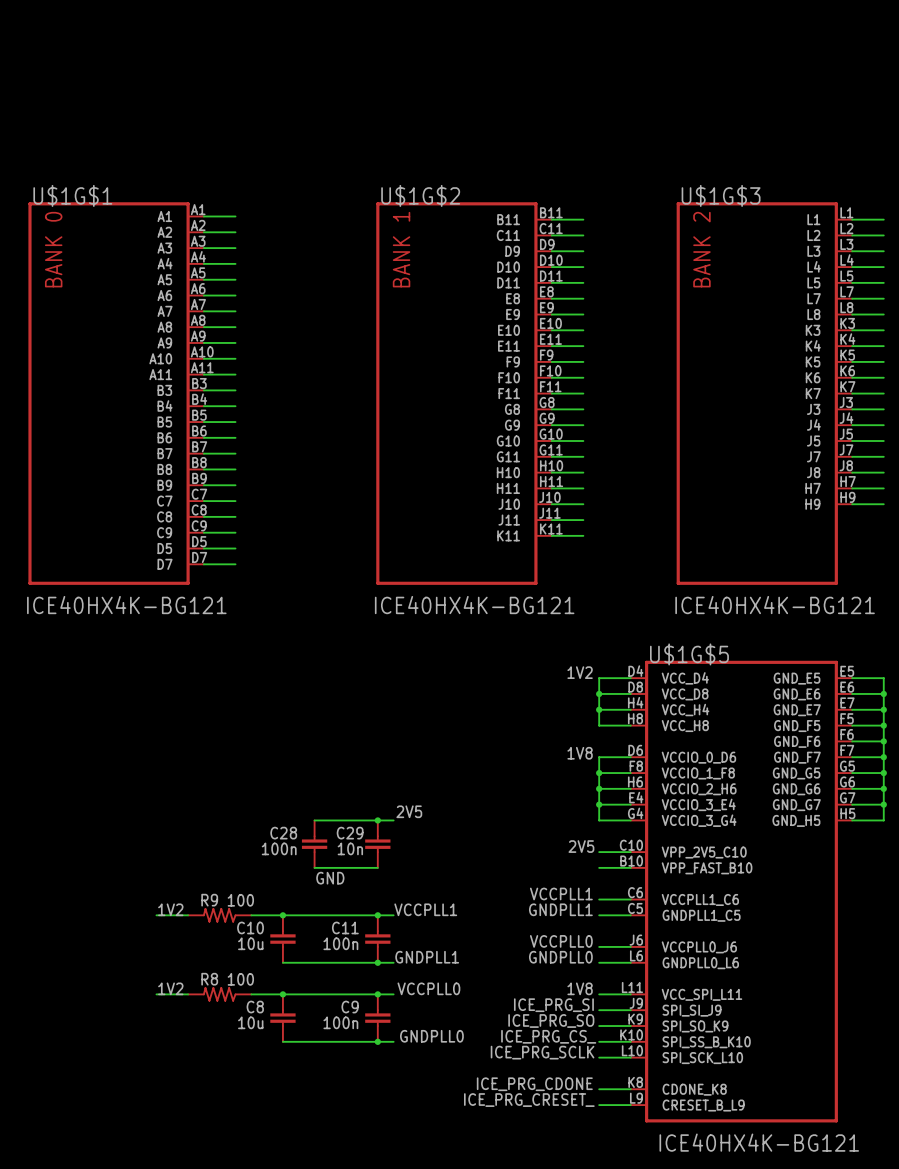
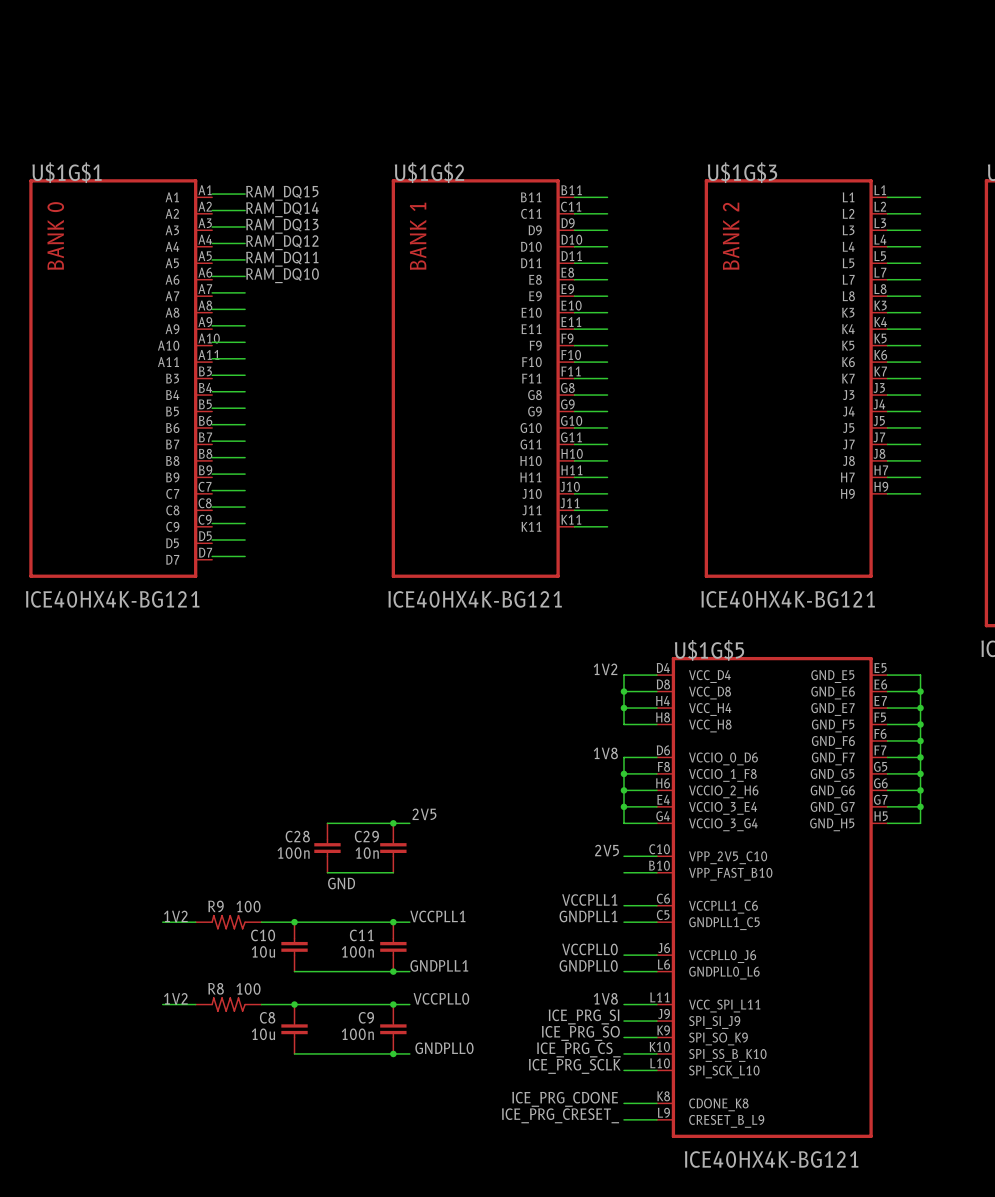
U$1G$1 symbol: [28, 202, 204, 585] -> [29, 179, 213, 578]
label: none -> RAM_DQ15 (282, 193)
label: none -> RAM_DQ14 (282, 209)
label: none -> RAM_DQ13 (282, 226)
label: none -> RAM_DQ12 (282, 242)
label: none -> RAM_DQ11 (282, 259)
label: none -> RAM_DQ10 (282, 275)

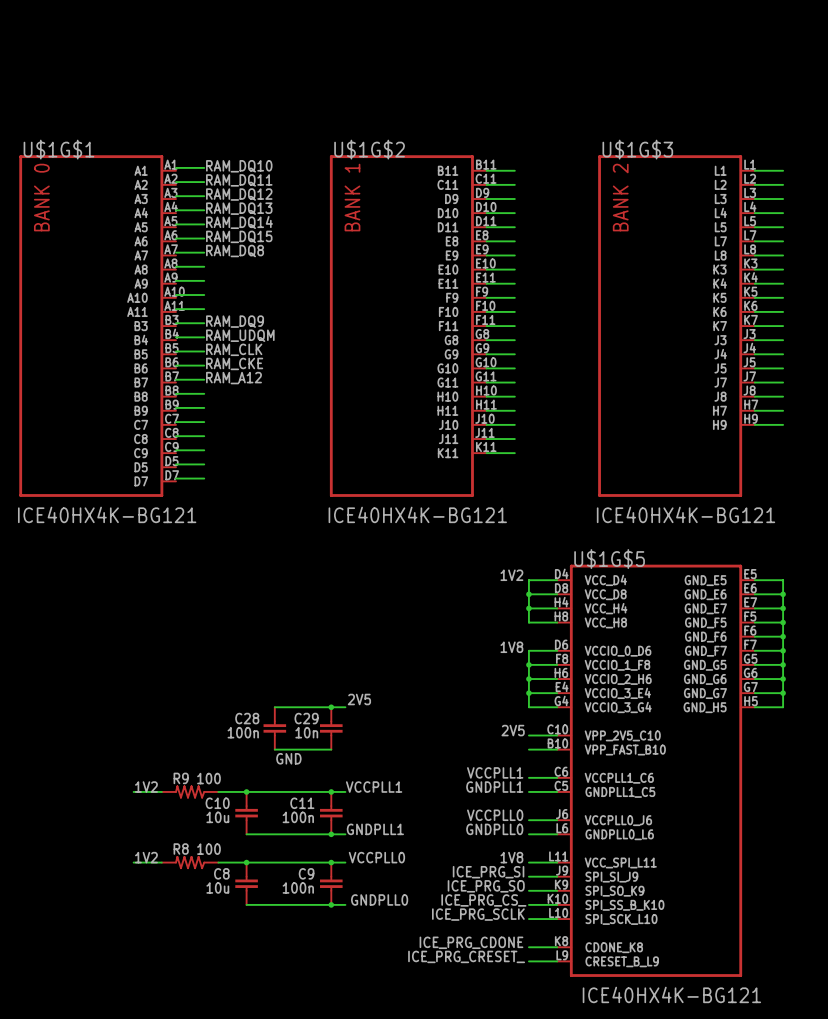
label: RAM_DQ15 (282, 193) -> RAM_DQ10 (239, 166)
label: RAM_DQ14 (282, 209) -> RAM_DQ11 (239, 180)
label: RAM_DQ13 (282, 226) -> RAM_DQ12 (239, 194)
label: RAM_DQ12 (282, 242) -> RAM_DQ13 (239, 208)
label: RAM_DQ11 (282, 259) -> RAM_DQ14 (239, 222)
label: RAM_DQ10 (282, 275) -> RAM_DQ15 (239, 236)
label: none -> RAM_DQ8 (235, 251)
label: none -> RAM_DQ9 (235, 321)
label: none -> RAM_UDQM (240, 335)
label: none -> RAM_CLK (234, 349)
label: none -> RAM_CKE (234, 363)
label: none -> RAM_A12 (233, 378)

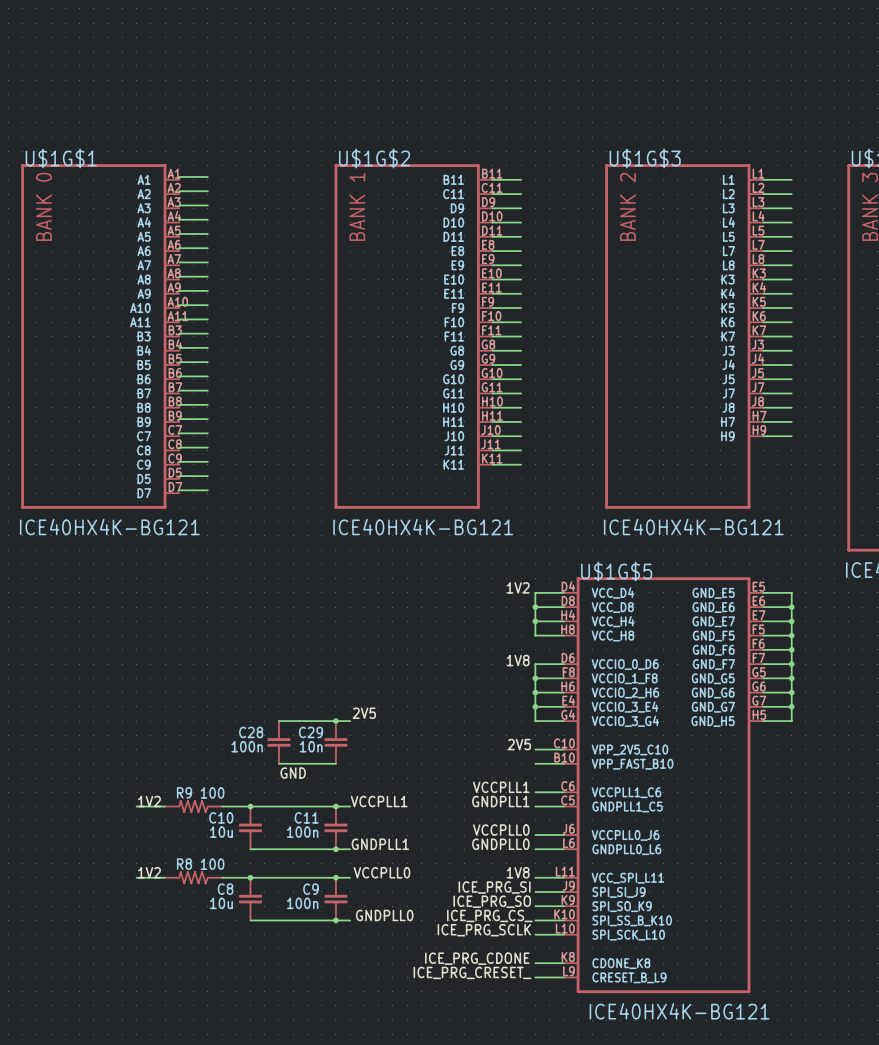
label: RAM_DQ10 (239, 166) -> none
label: RAM_DQ11 (239, 180) -> none
label: RAM_DQ12 (239, 194) -> none
label: RAM_DQ13 (239, 208) -> none
label: RAM_DQ14 (239, 222) -> none
label: RAM_DQ15 (239, 236) -> none
label: RAM_DQ8 (235, 251) -> none
label: RAM_DQ9 (235, 321) -> none
label: RAM_UDQM (240, 335) -> none
label: RAM_CLK (234, 349) -> none
label: RAM_CKE (234, 363) -> none
label: RAM_A12 (233, 378) -> none

